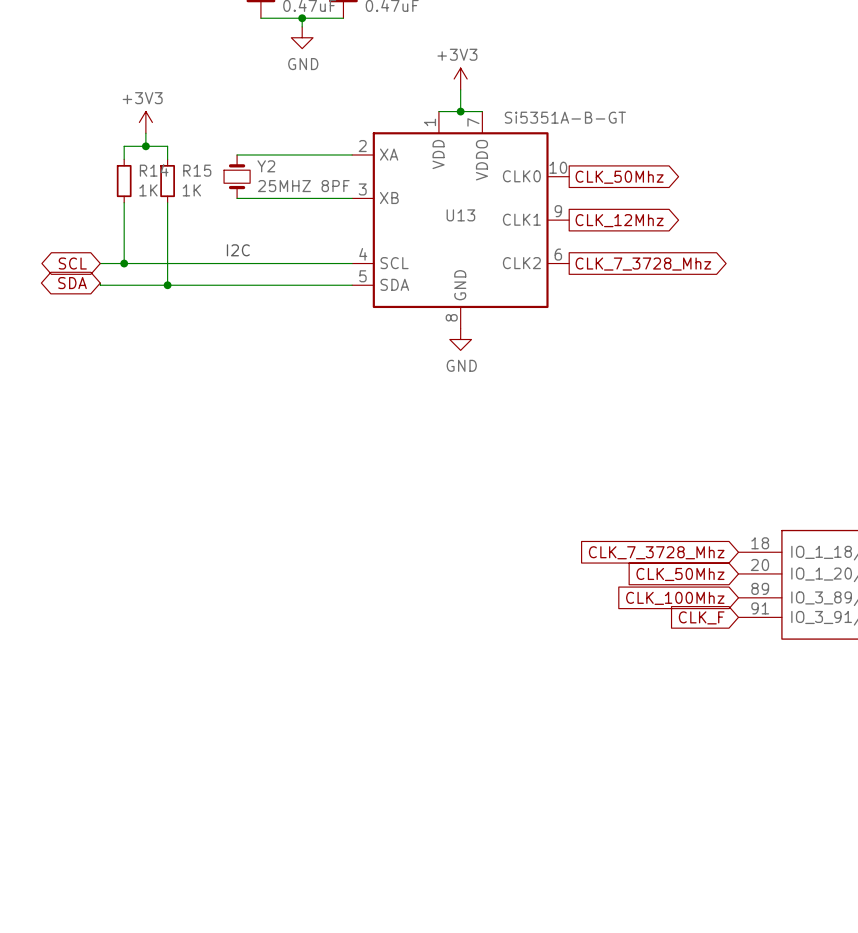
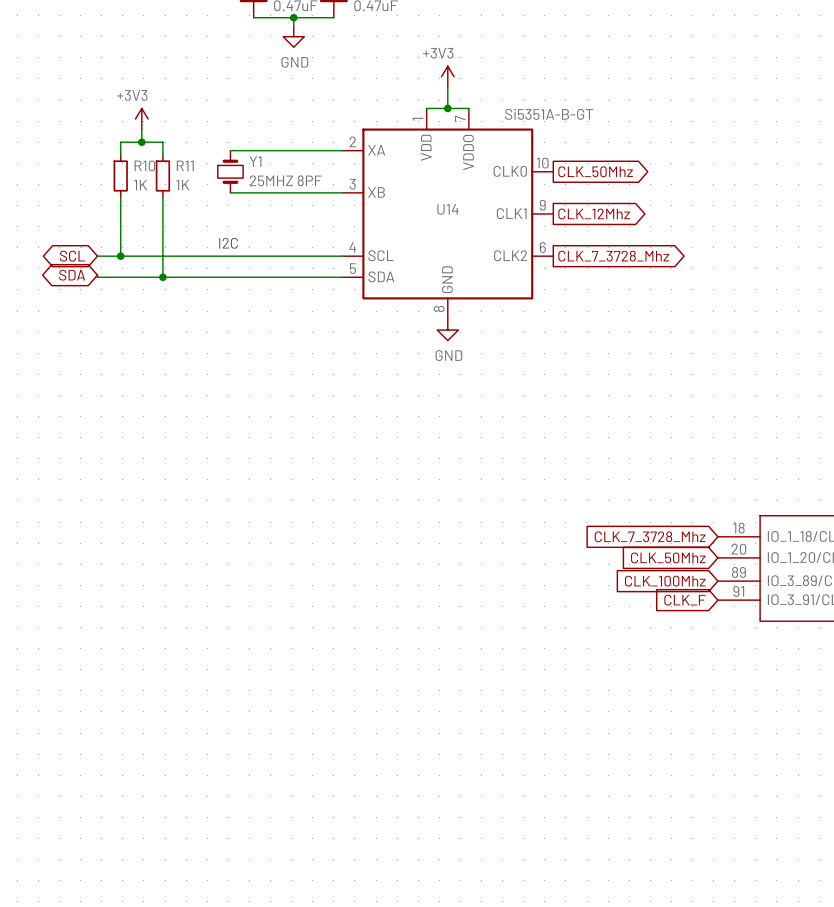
Y2 name: Y2 (266, 166) -> Y1 (255, 161)
R14 name: R14 (154, 170) -> R10 (144, 165)
R15 name: R15 (197, 170) -> R11 (185, 165)
U13 name: U13 (460, 215) -> U14 (447, 209)

